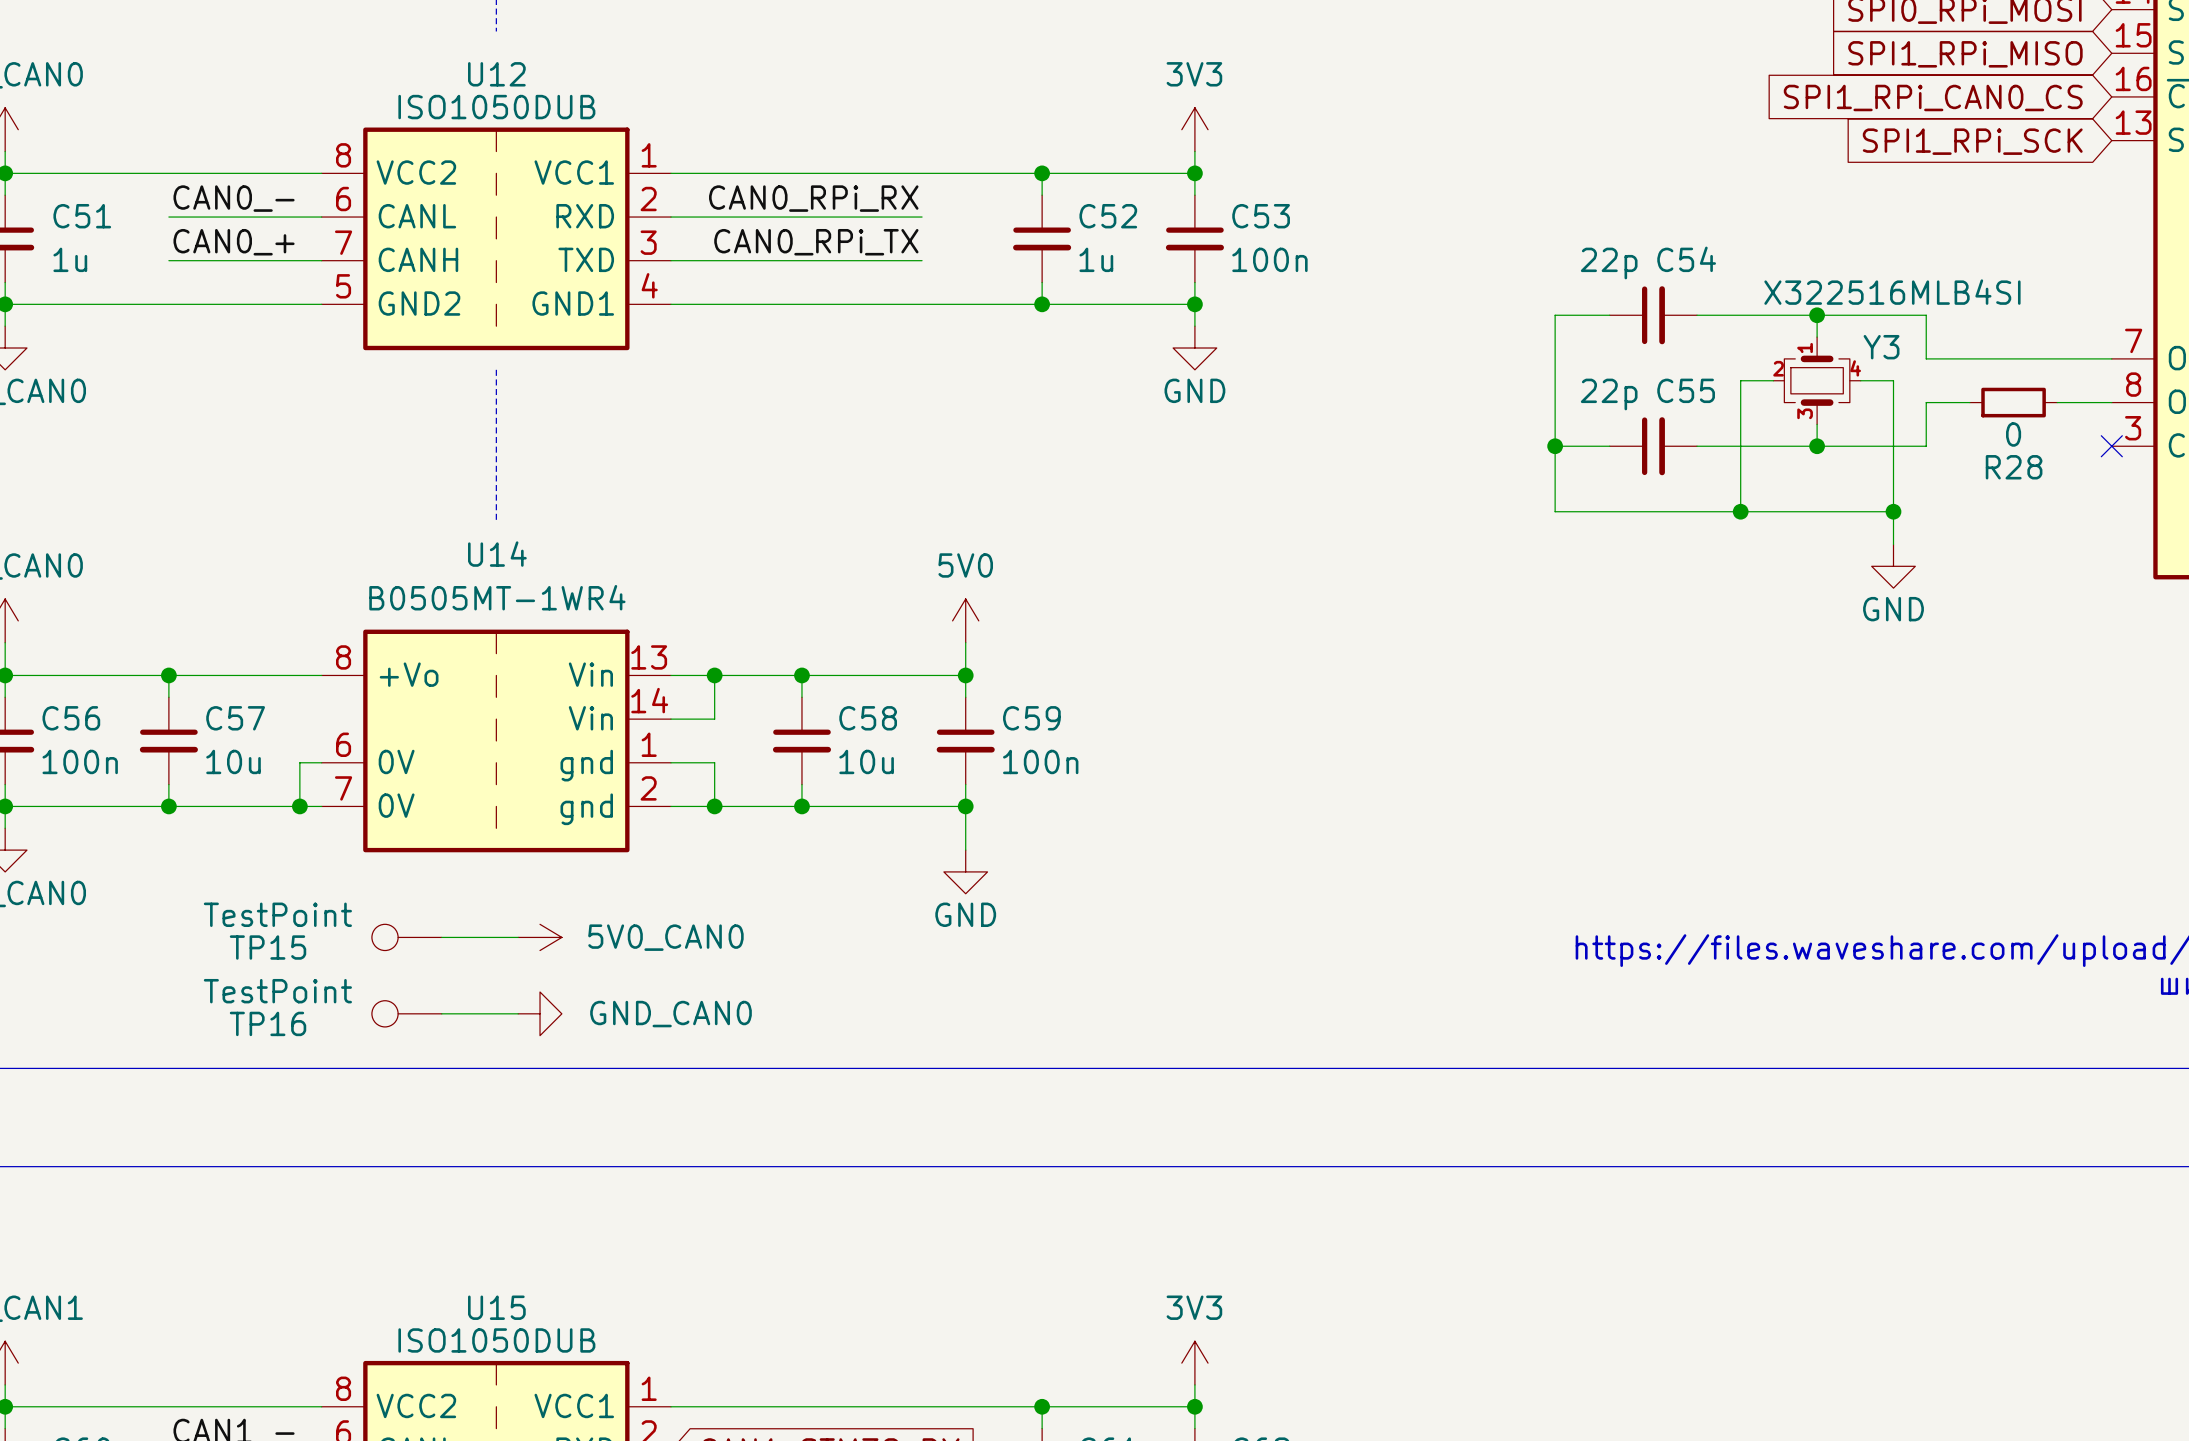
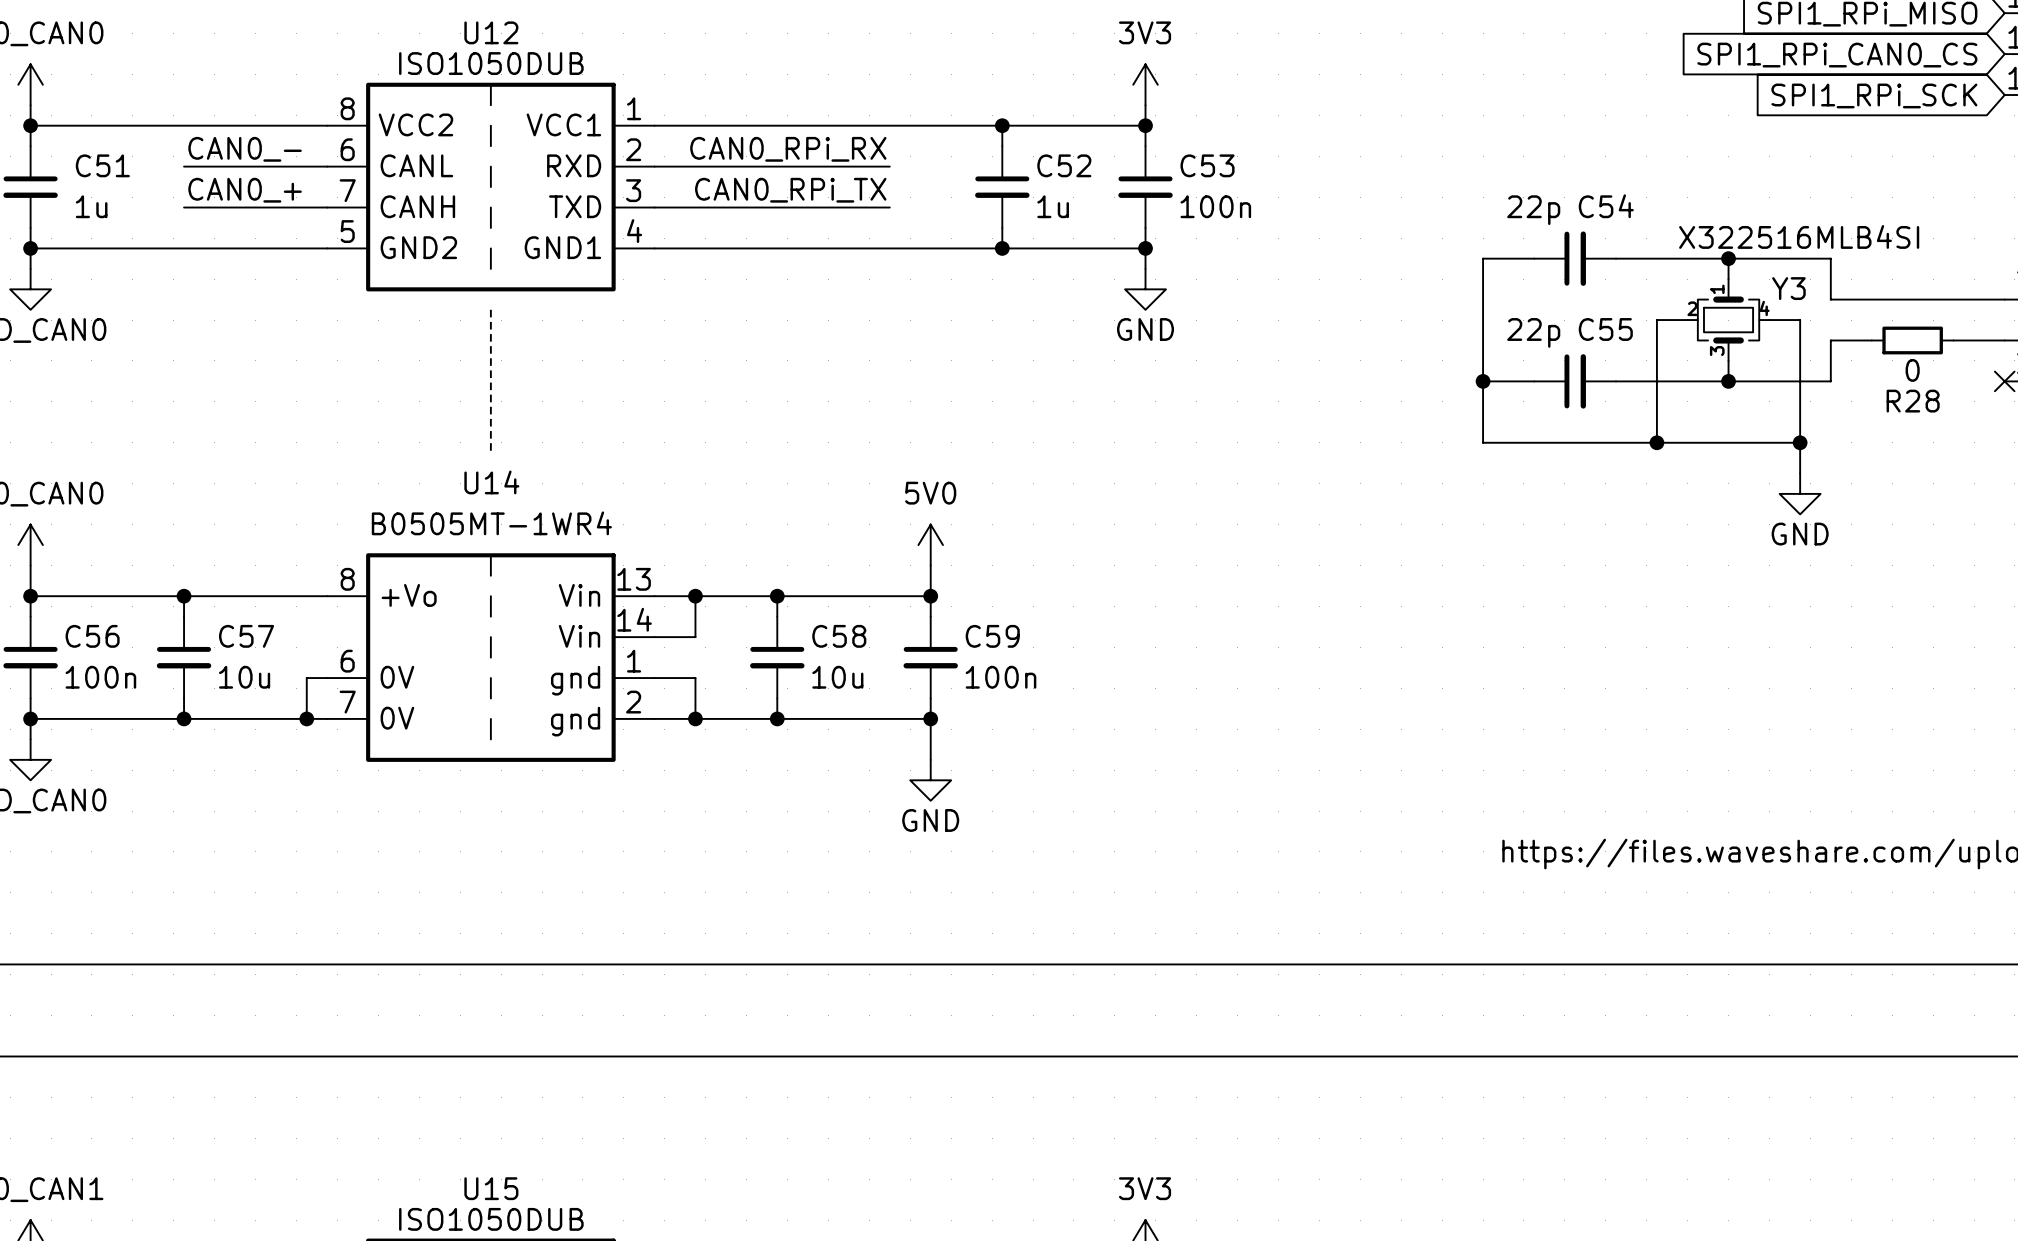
TP15: TestPoint (406, 937) -> none
wire: (441, 937) (518, 937) -> none
power symbol: 5V0_CAN0 (540, 937) -> none
TP16: TestPoint (406, 1013) -> none
wire: (441, 1013) (518, 1013) -> none
power symbol: GND_CAN0 (540, 1013) -> none

